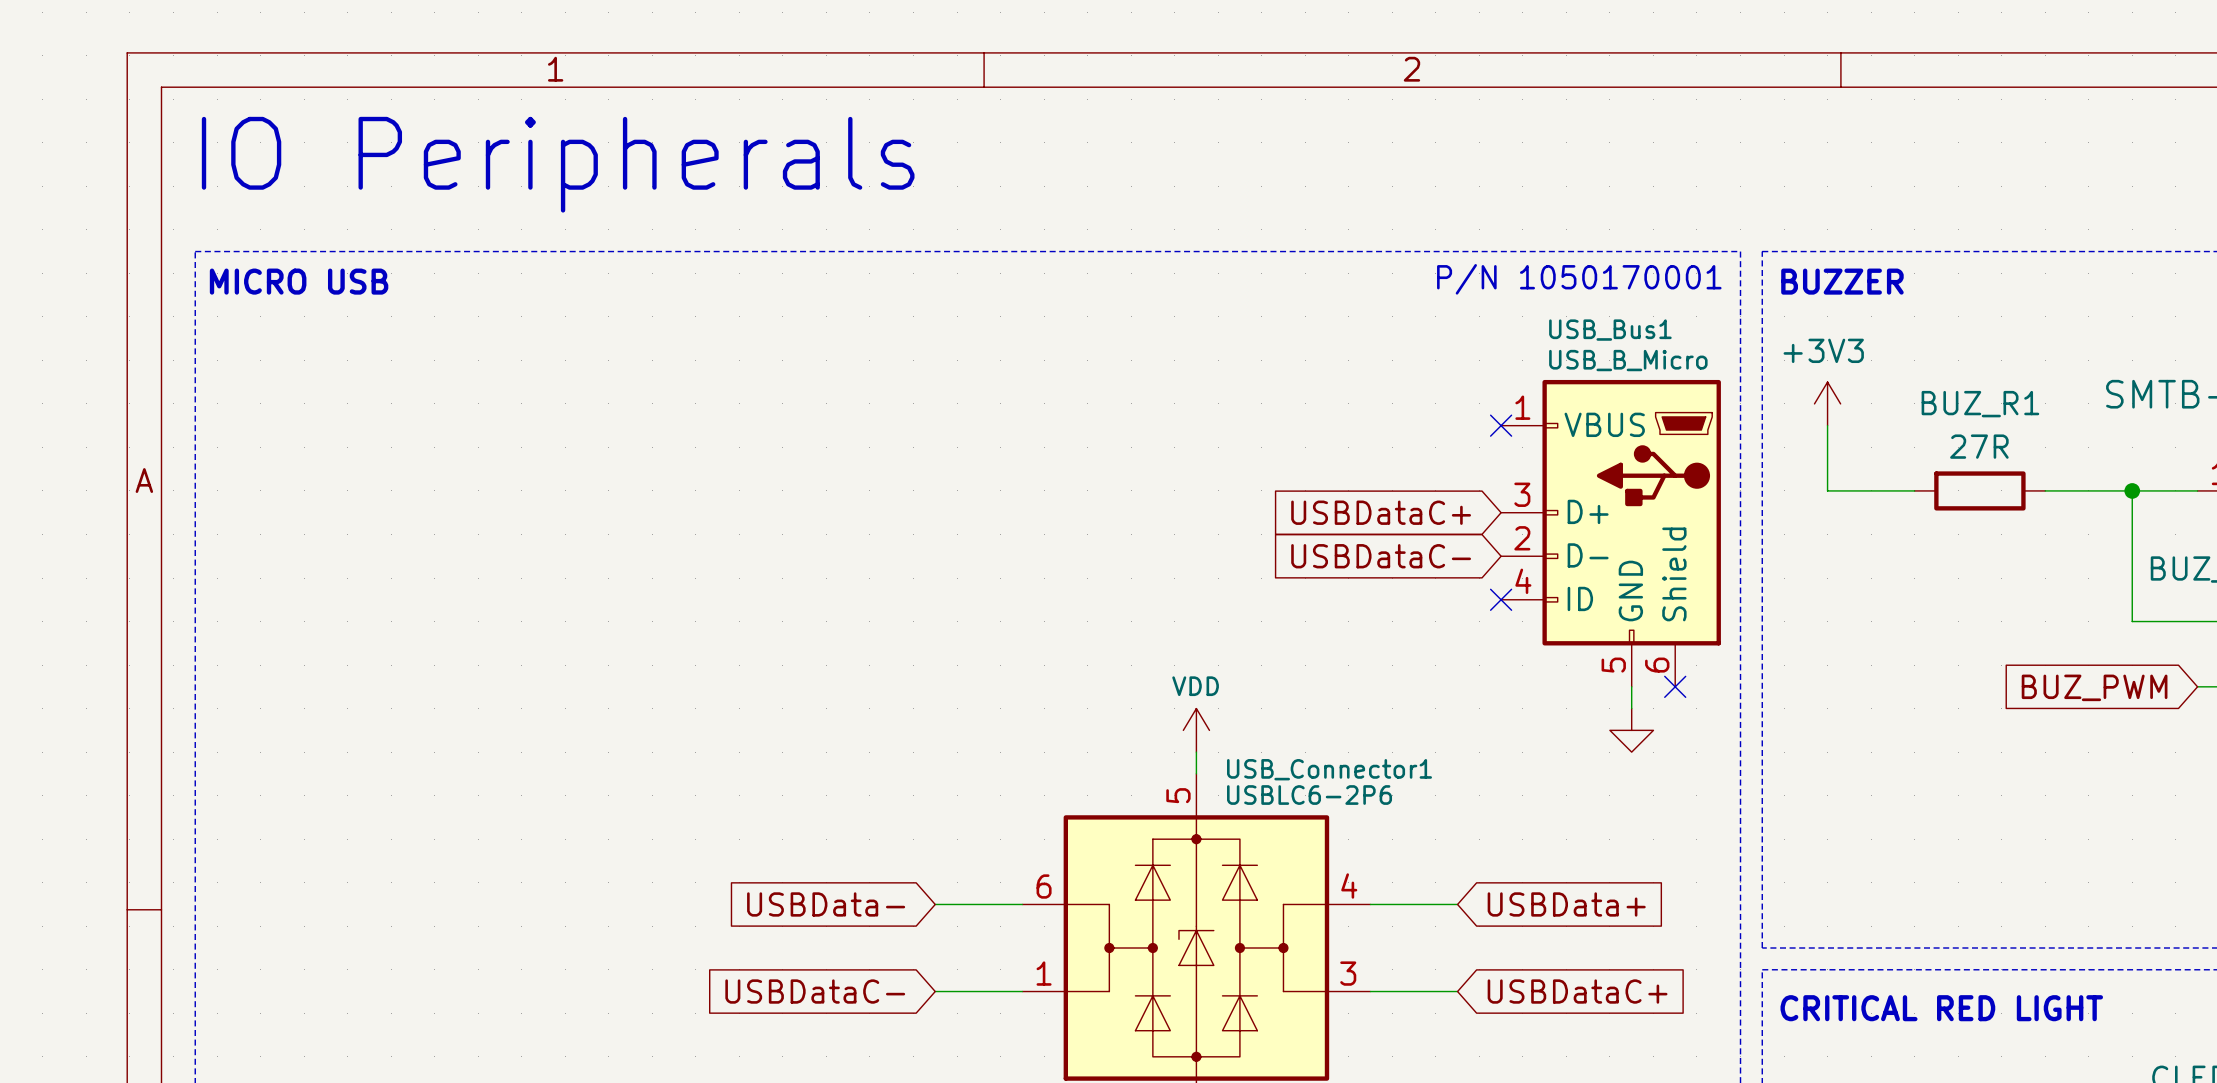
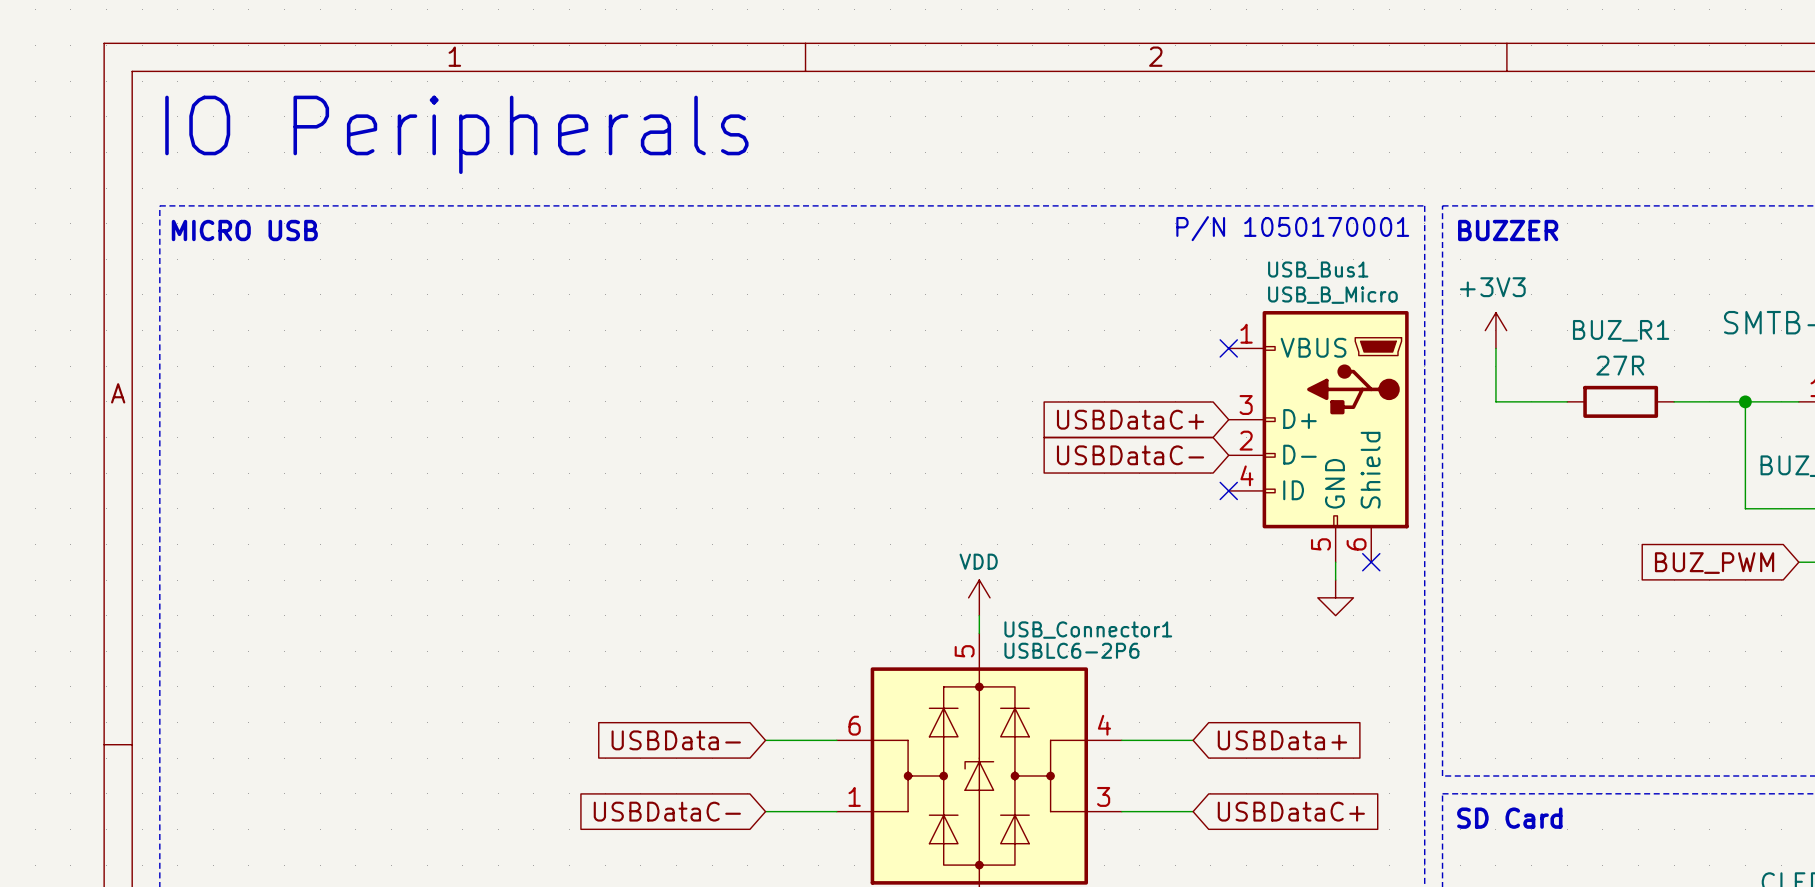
text: none -> SD Card (1509, 818)
text: CRITICAL RED LIGHT (1941, 1008) -> none

